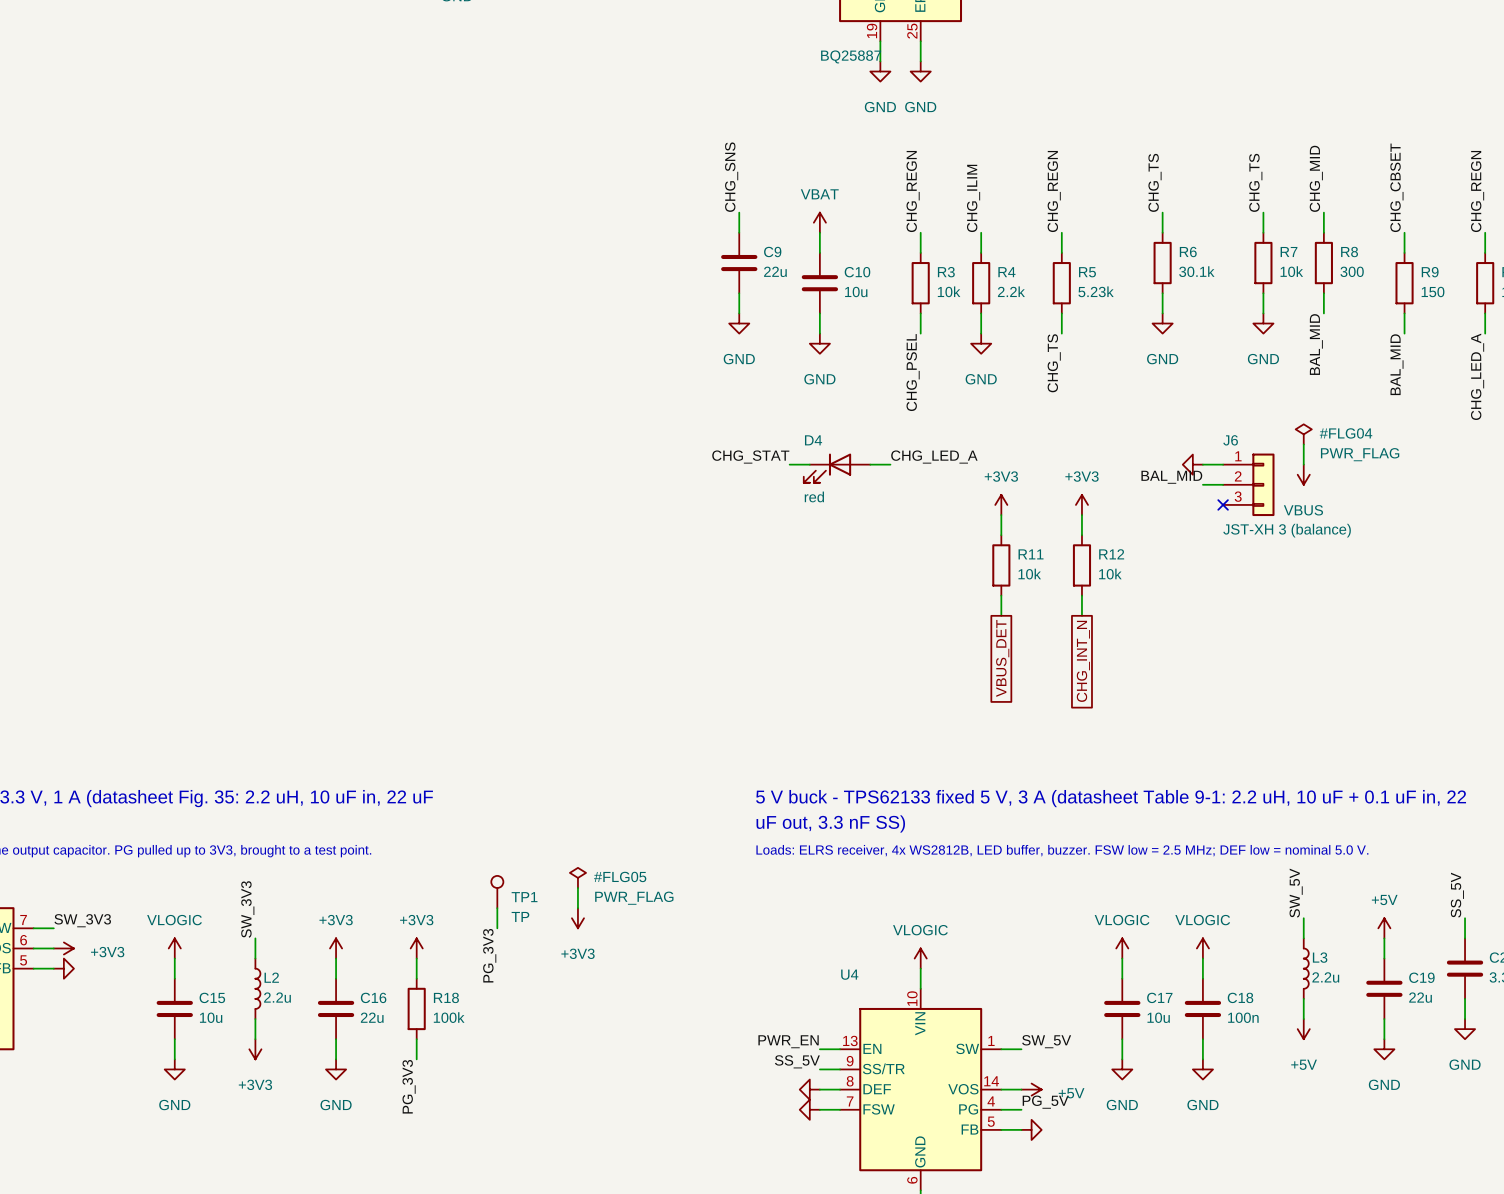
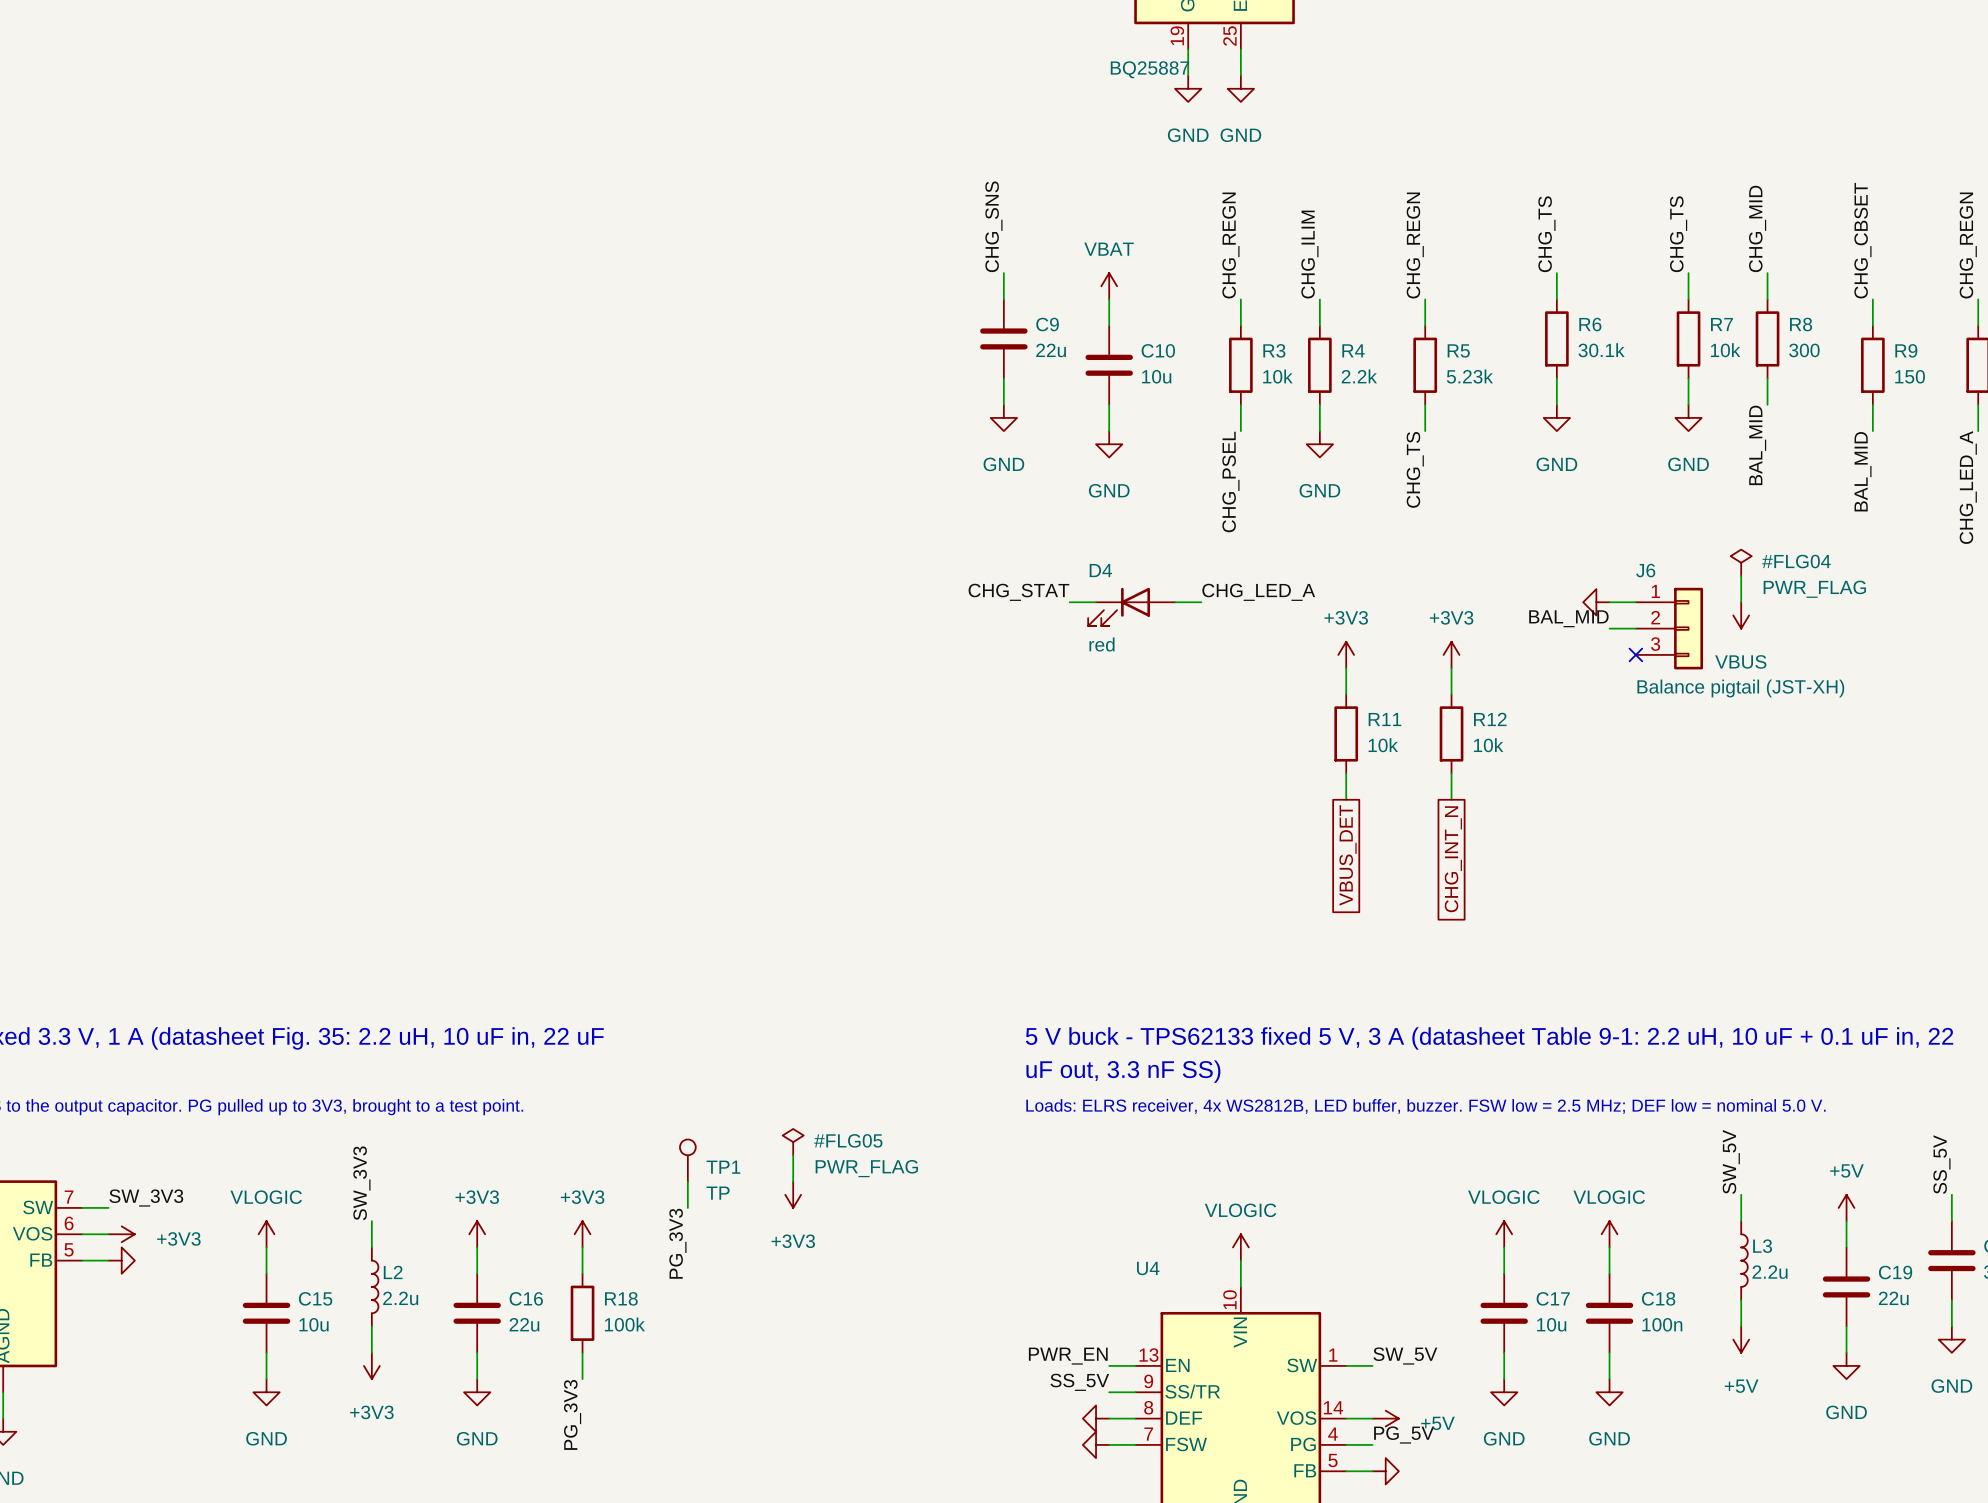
J6 value: JST-XH 3 (balance) (1287, 530) -> Balance pigtail (JST-XH) (1740, 688)

